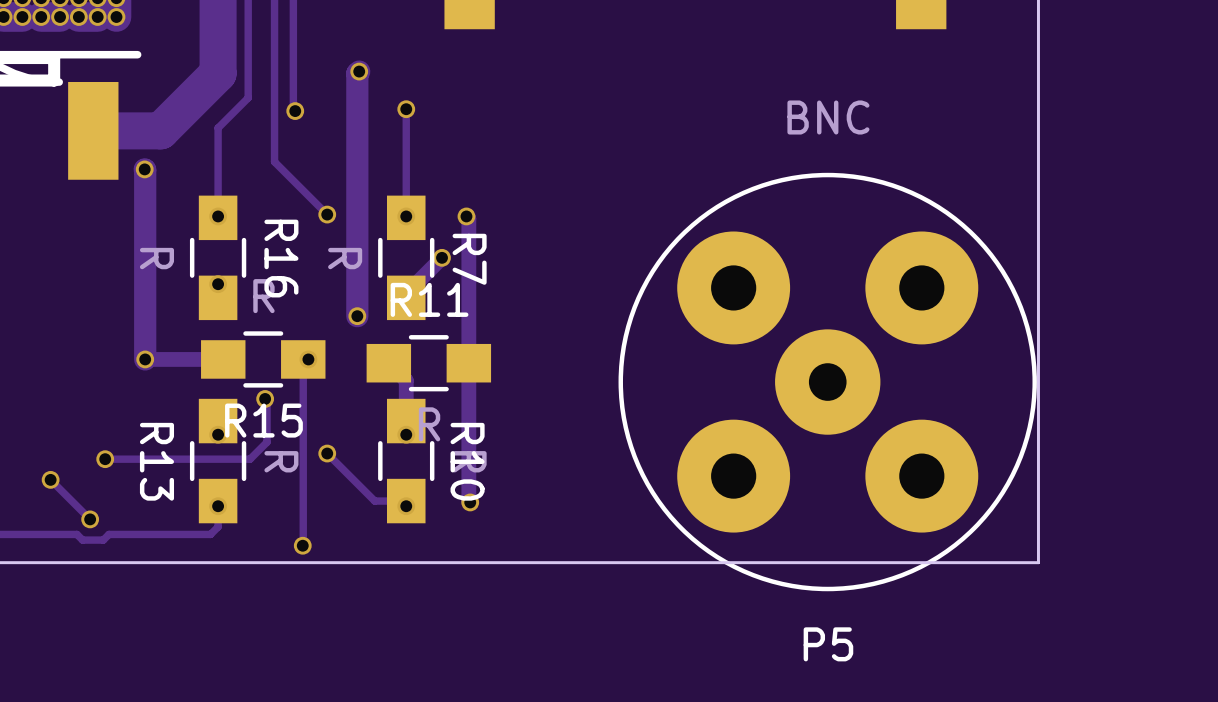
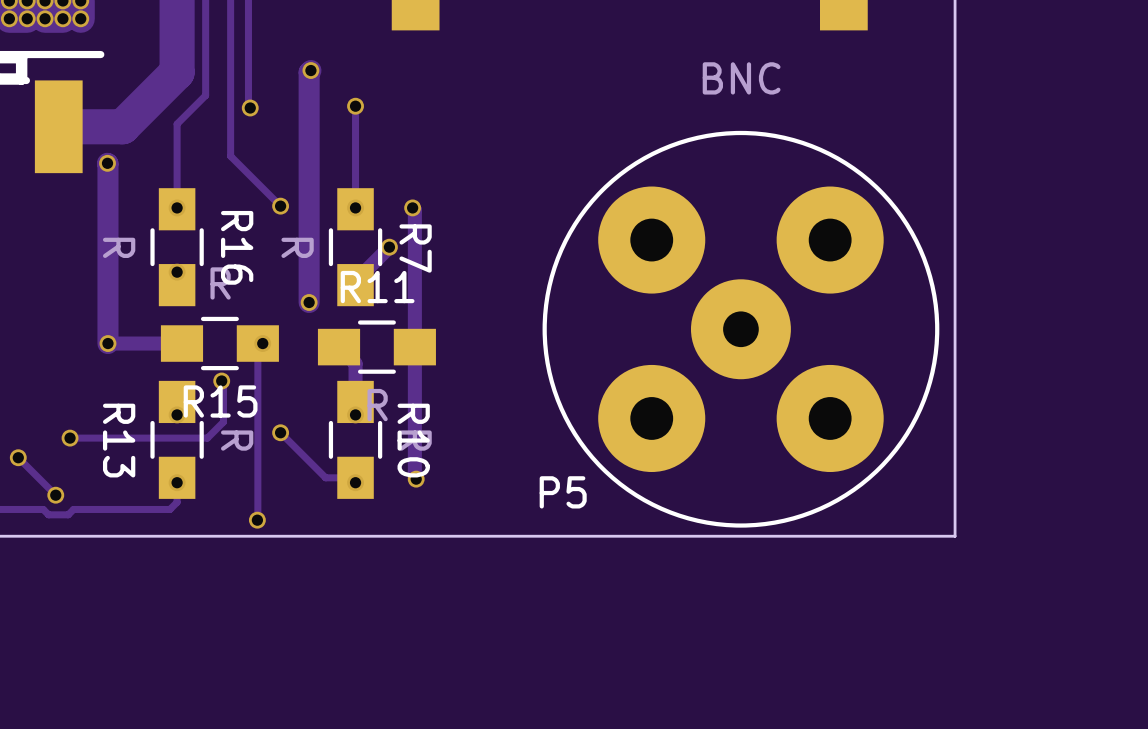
P5 position: (827, 382) -> (740, 329)
P5 name position: P5 (828, 644) -> P5 (563, 492)

